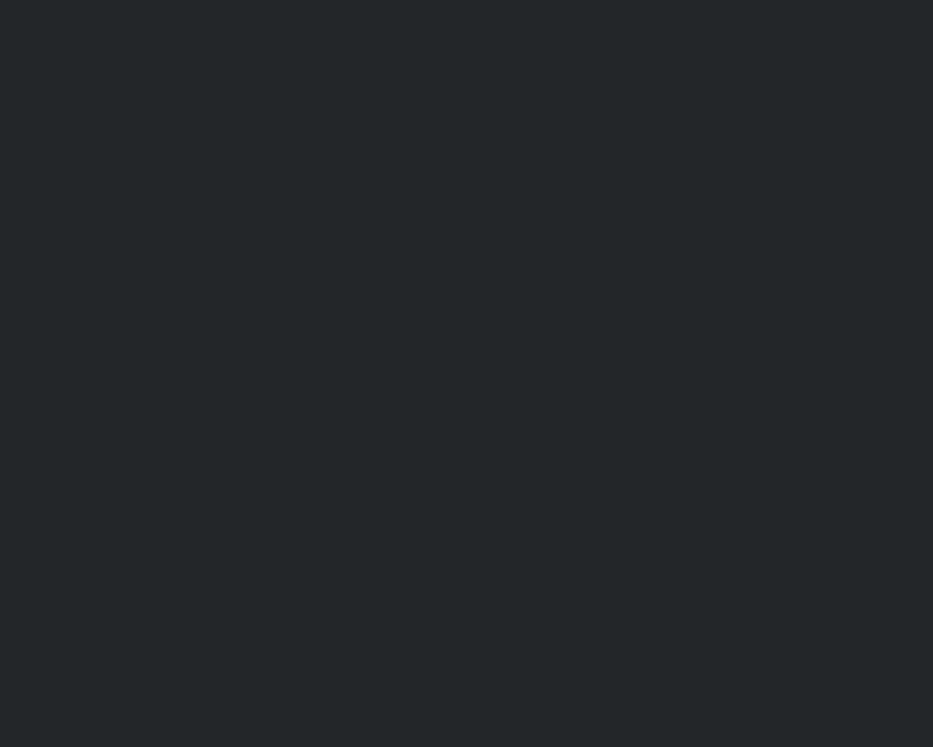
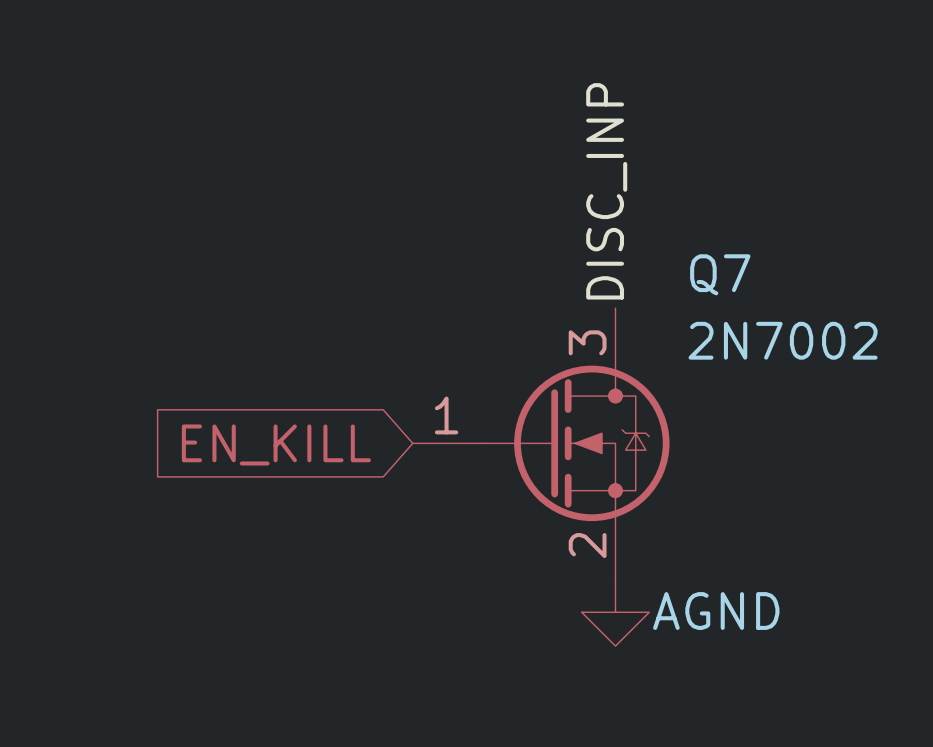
label: none -> DISC_INP (606, 191)
Q7: none -> 2N7002 (541, 443)
global label: none -> EN_KILL (276, 444)
power symbol: none -> AGND (615, 612)

